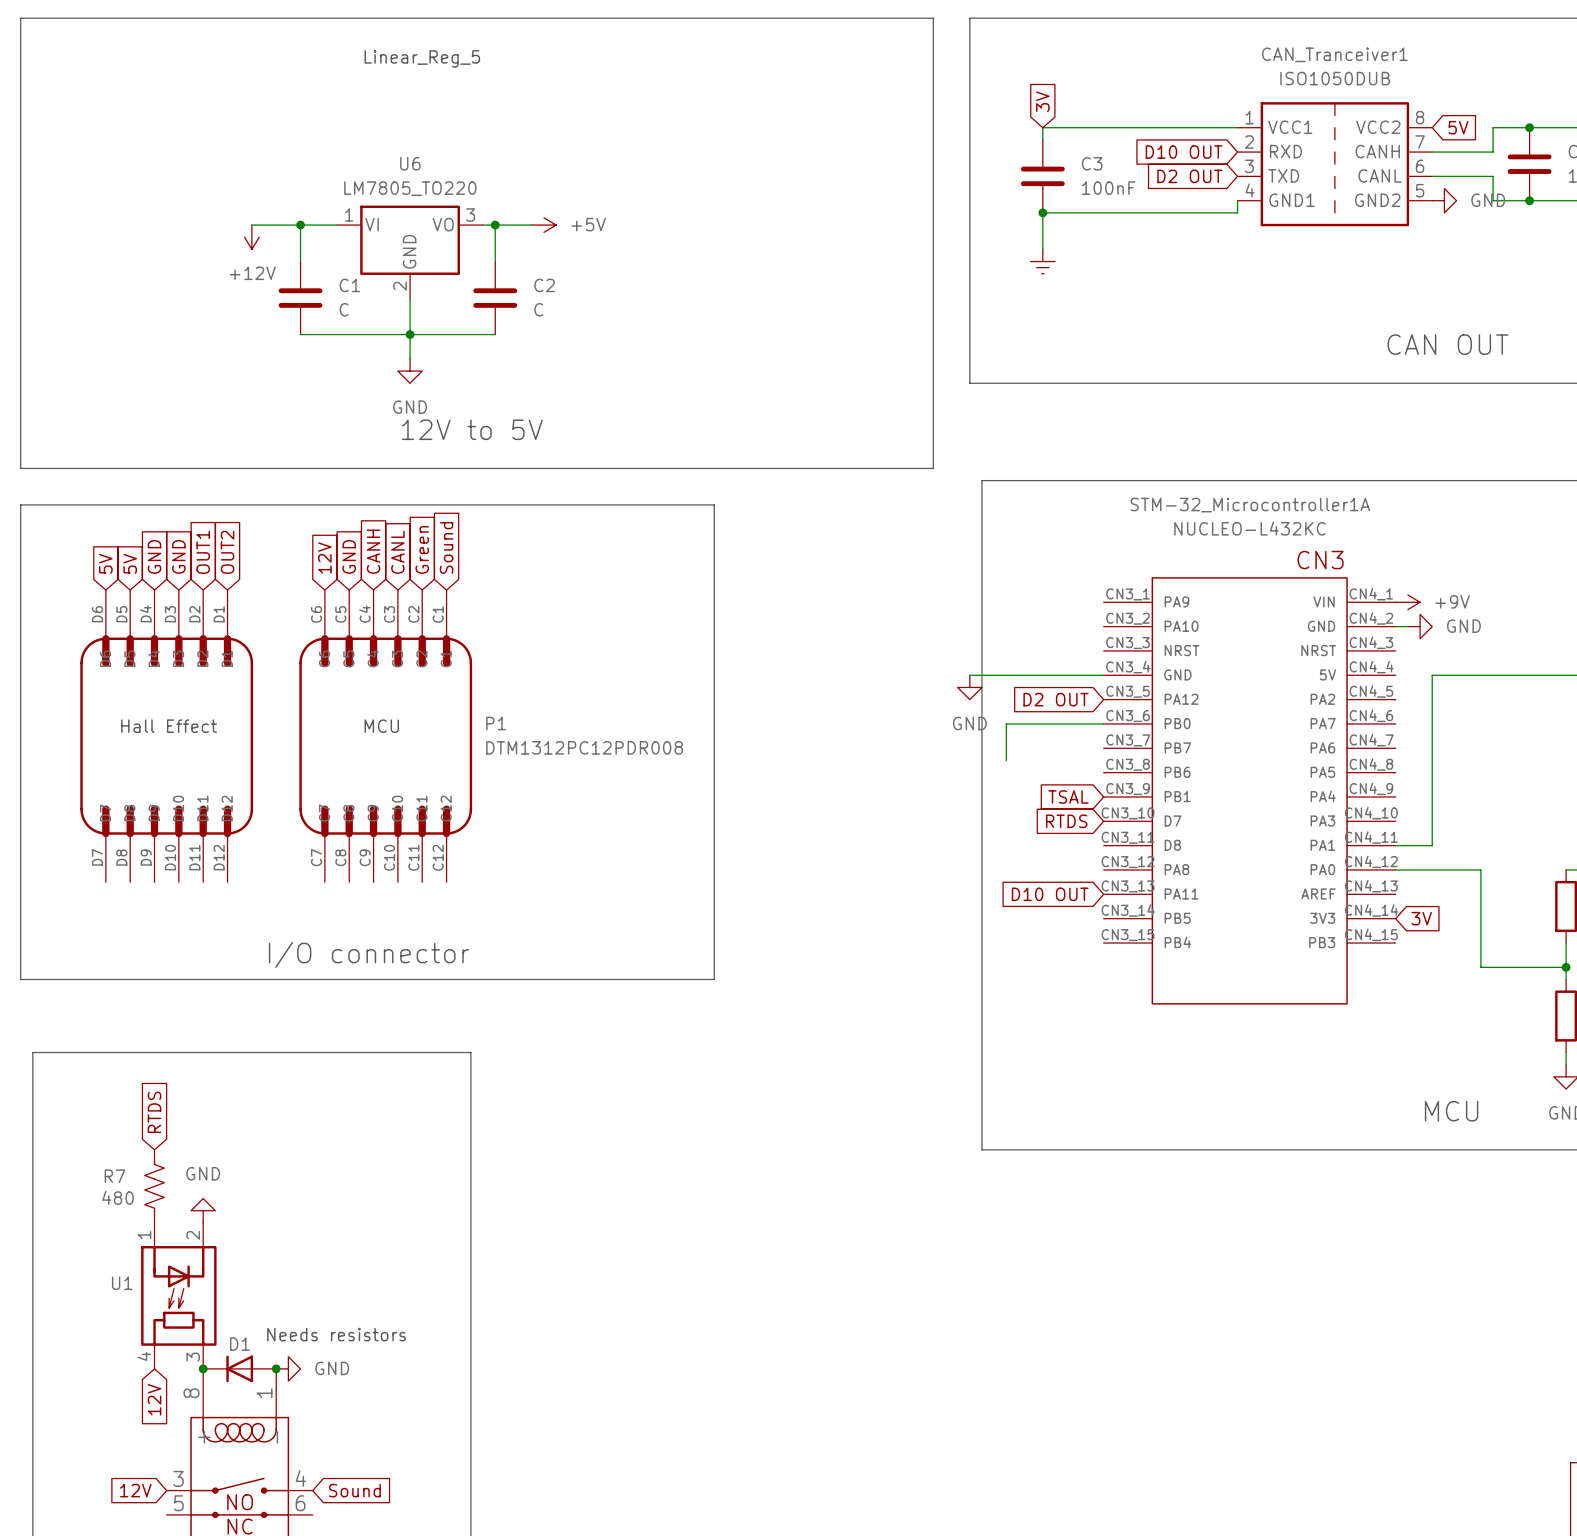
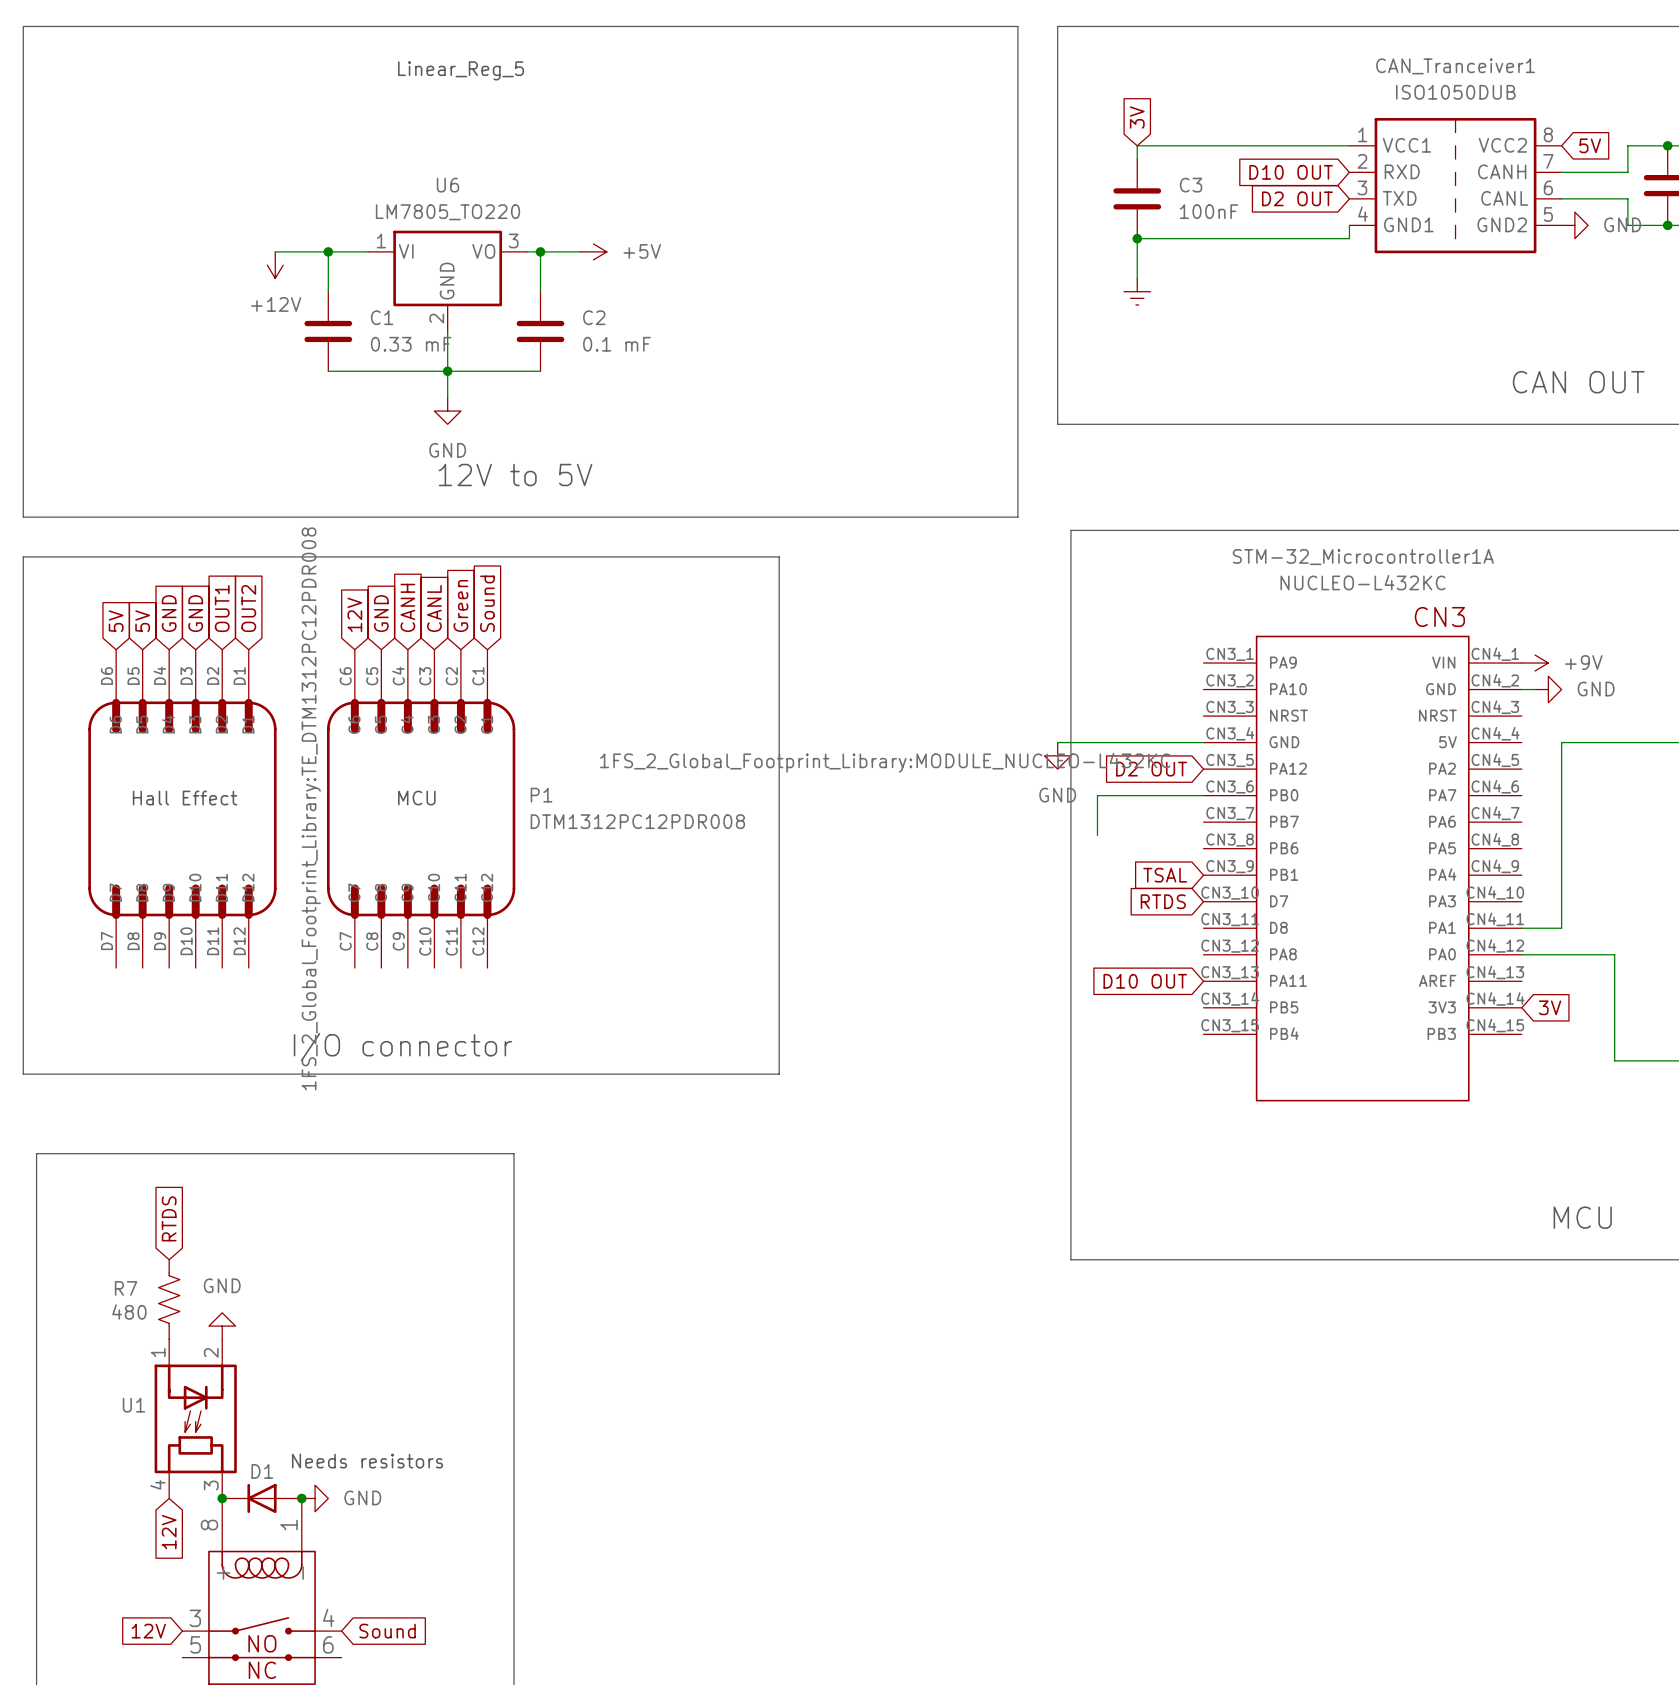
C1 value: C (344, 309) -> 0.33 mF (411, 344)
C2 value: C (538, 309) -> 0.1 mF (617, 344)
STM-32_Microcontroller1A text: none -> 1FS_2_Global_Footprint_Library:MODULE_NUCLEO-L432KC (885, 762)
P1 text: none -> 1FS_2_Global_Footprint_Library:TE_DTM1312PC12PDR008 (311, 808)

